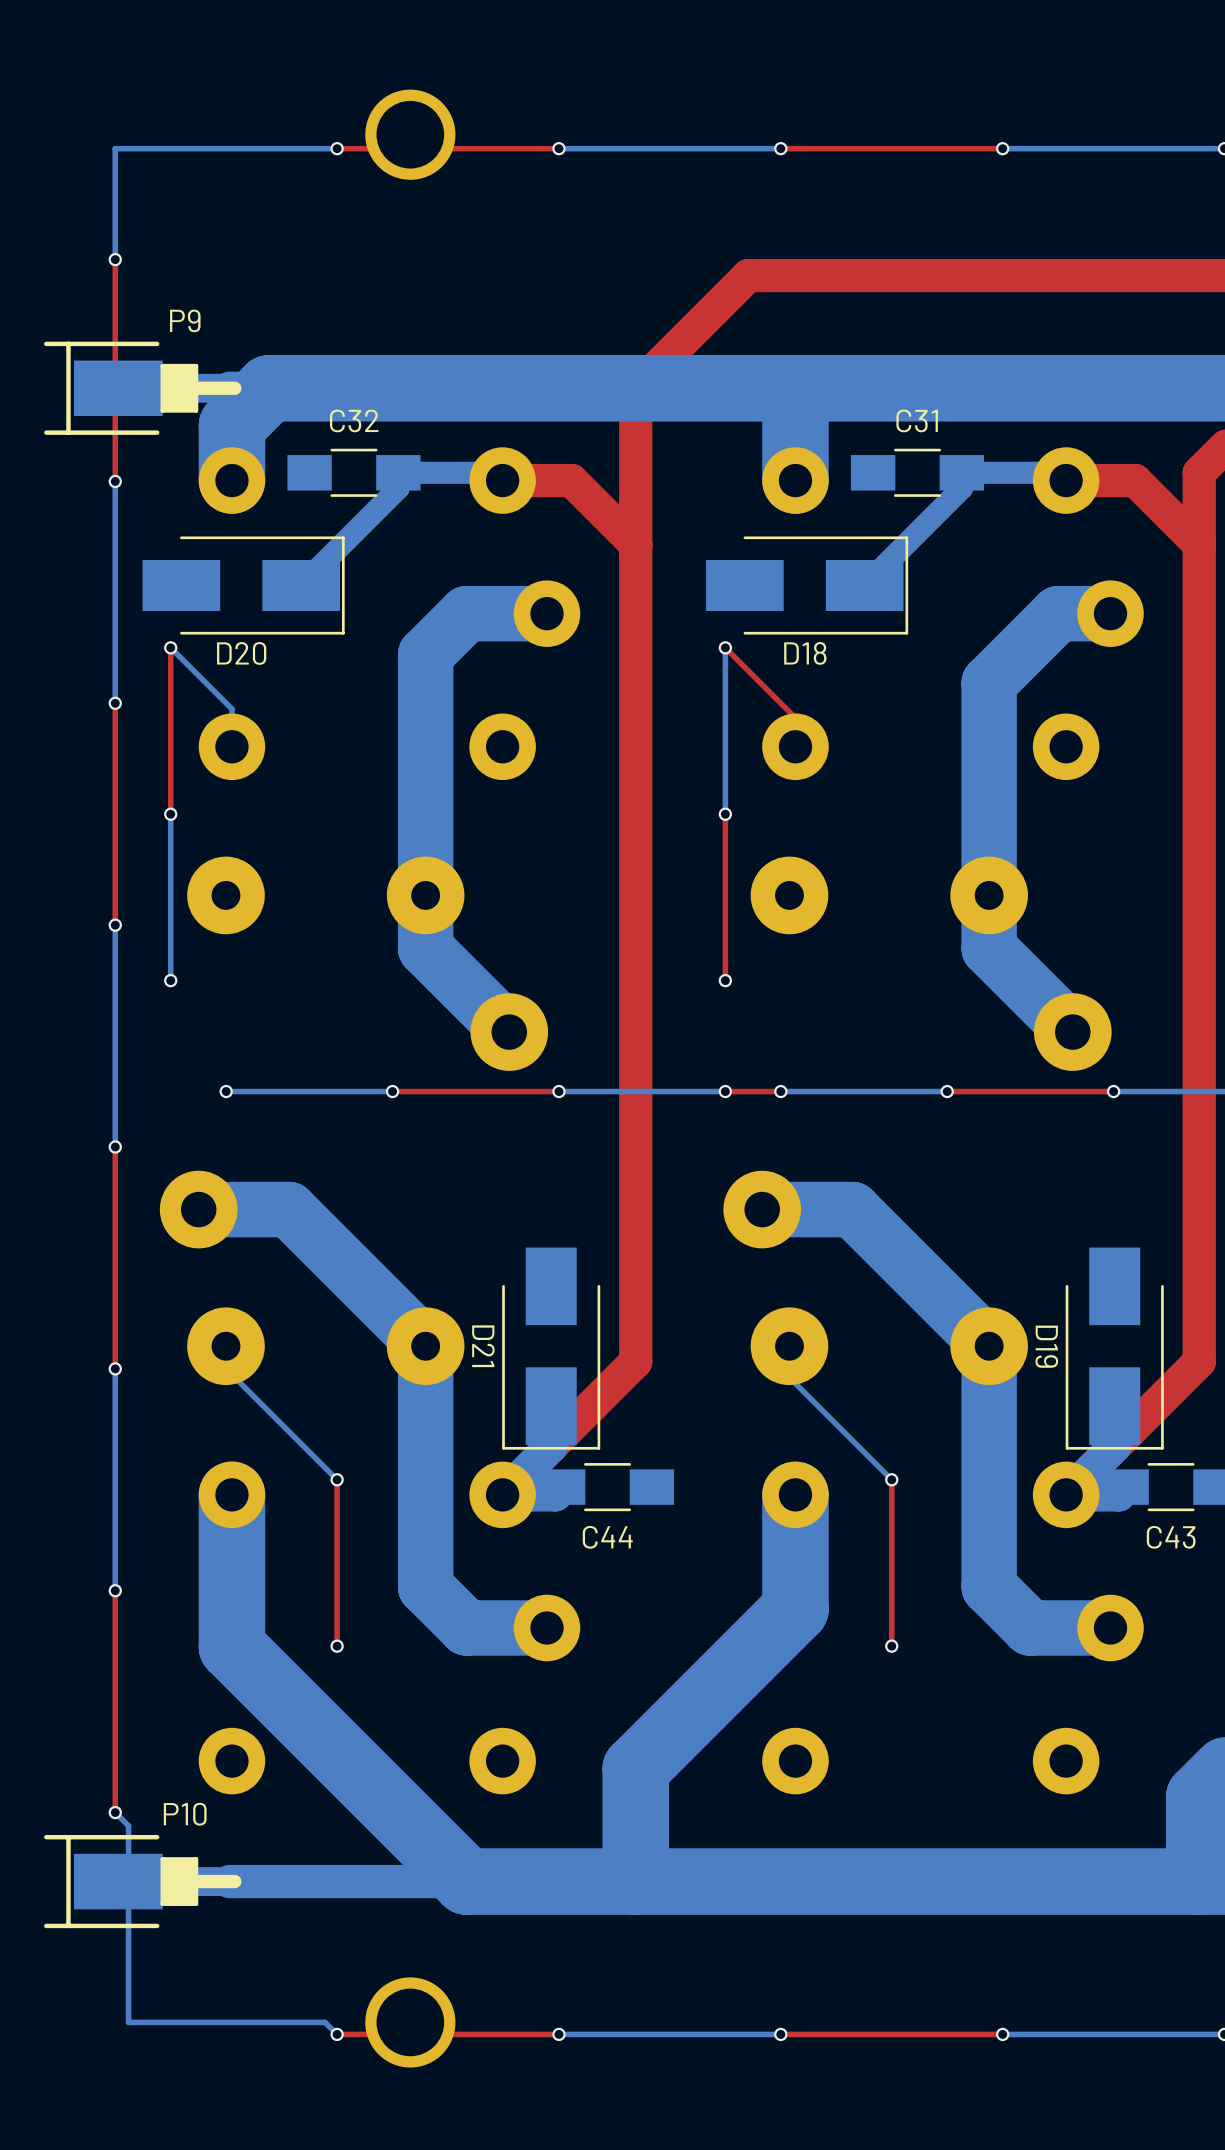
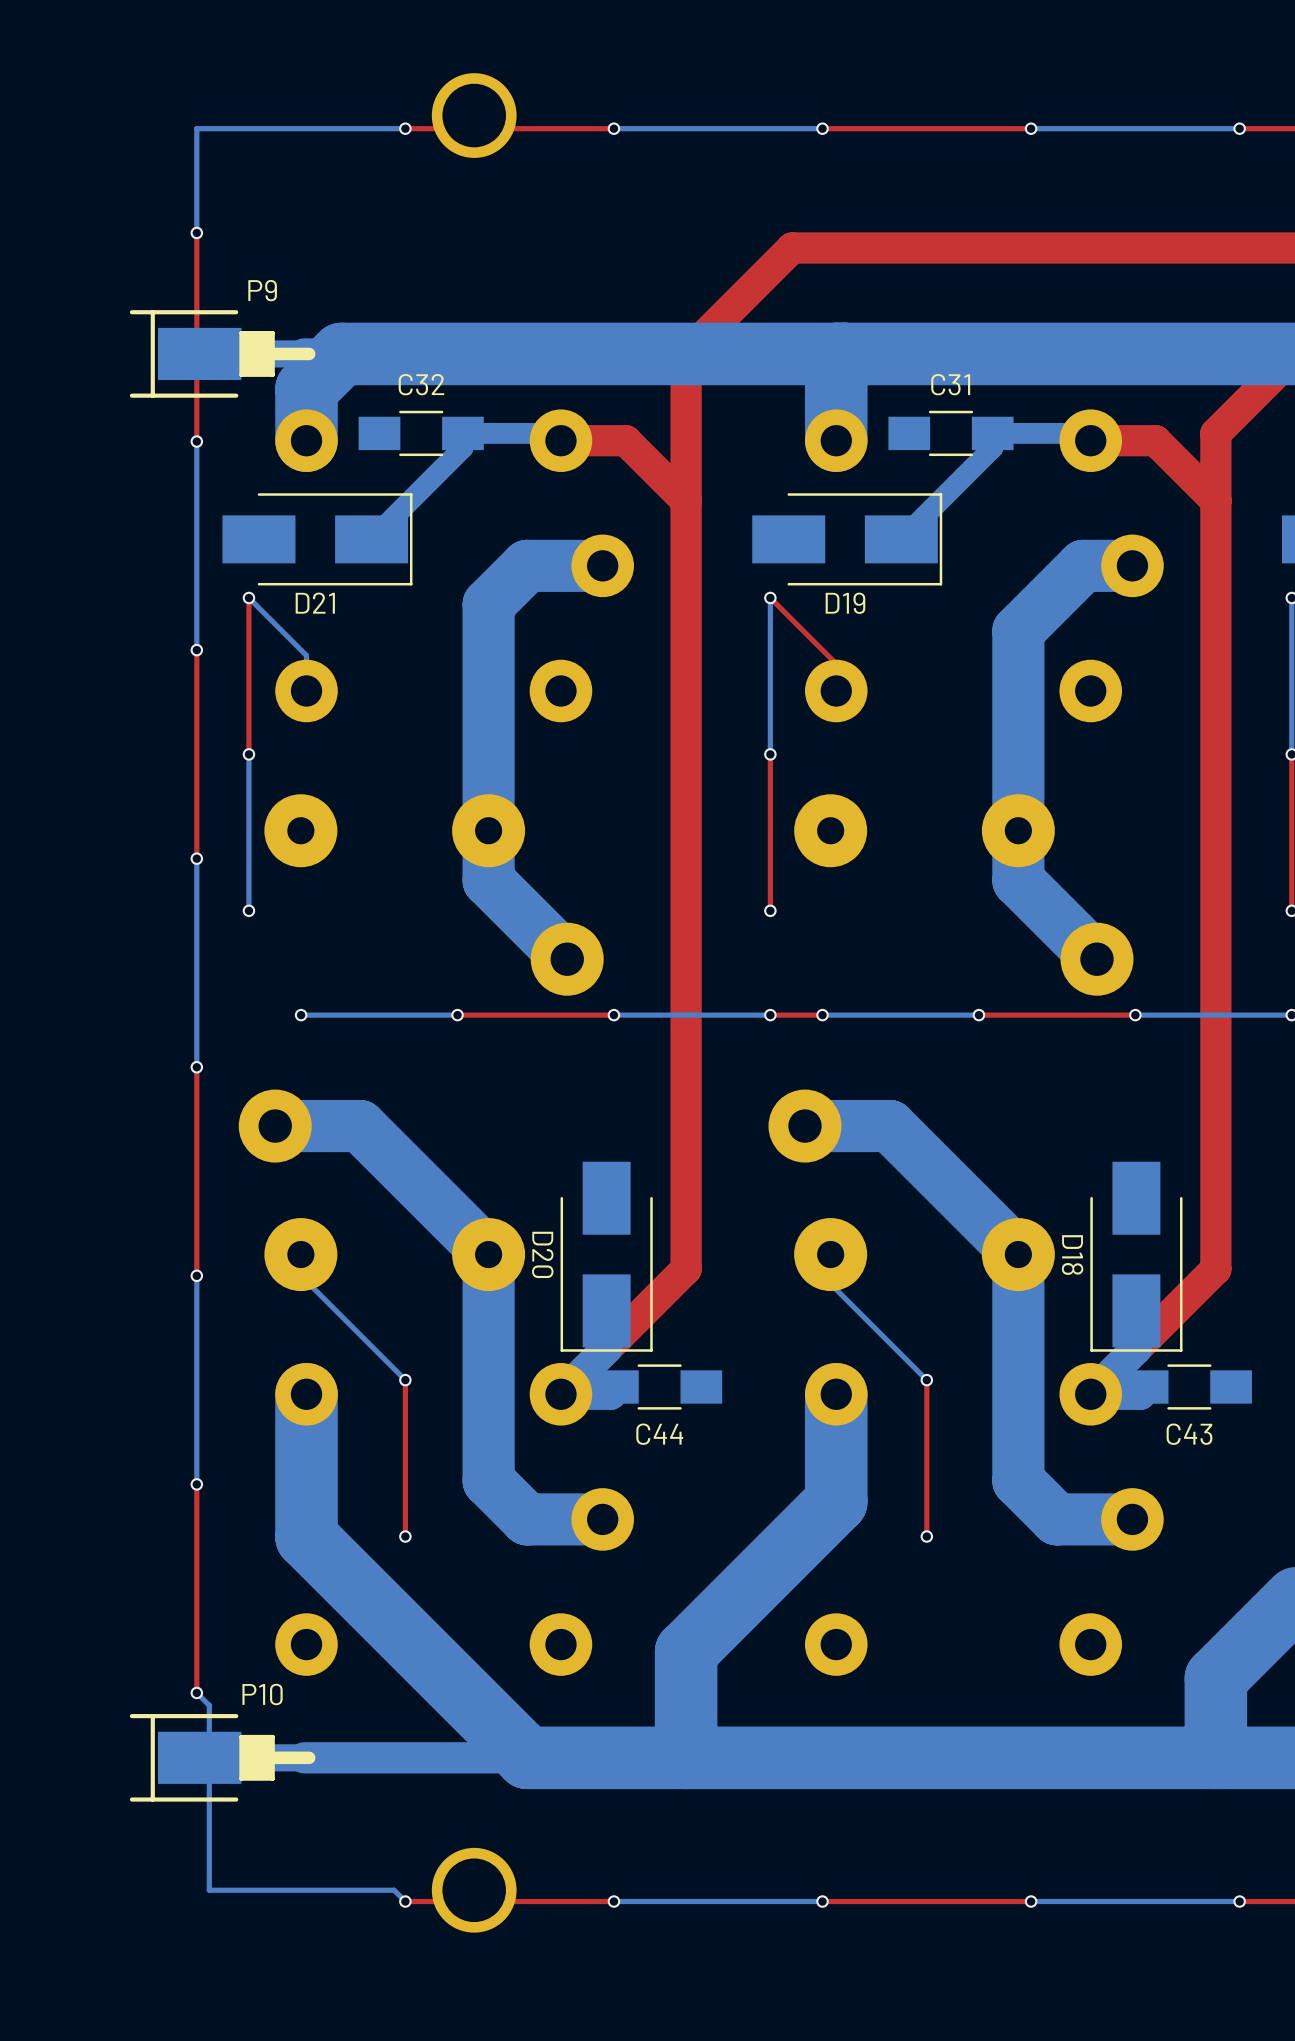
D20 name: D20 (241, 653) -> D21 (315, 603)
D18 name: D18 (805, 653) -> D19 (845, 603)
D21 name: D21 (483, 1346) -> D20 (542, 1254)
D19 name: D19 (1046, 1346) -> D18 (1072, 1255)

